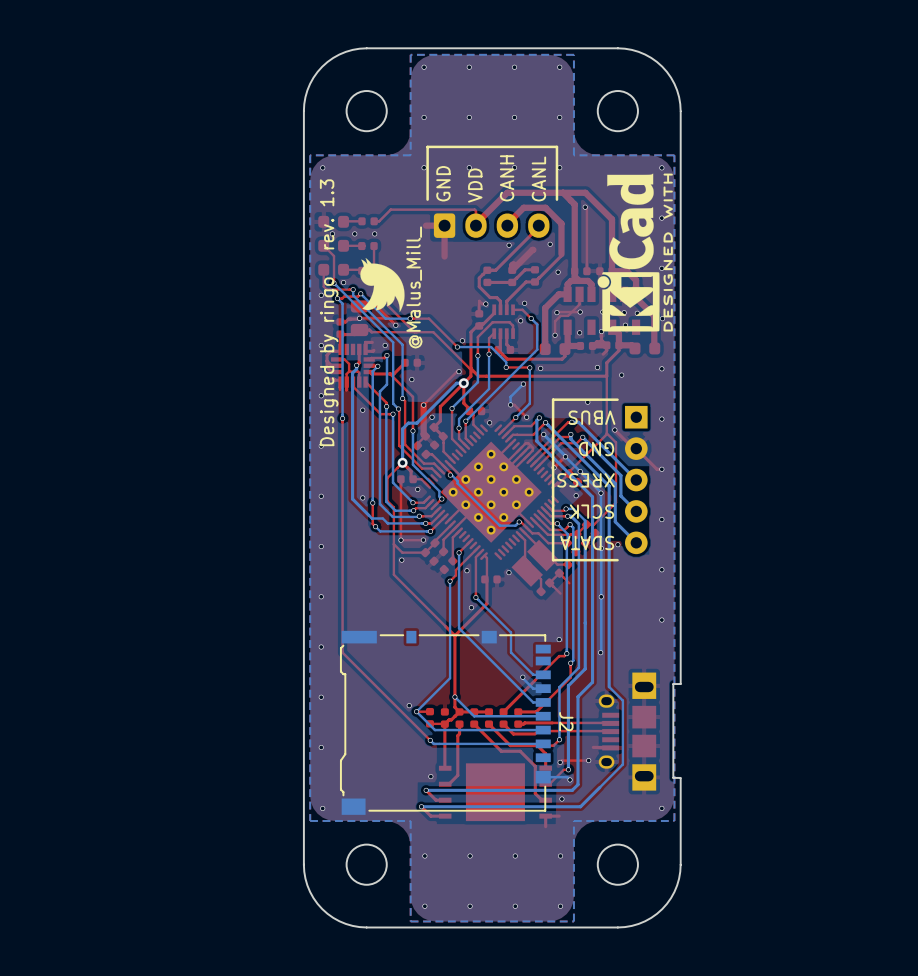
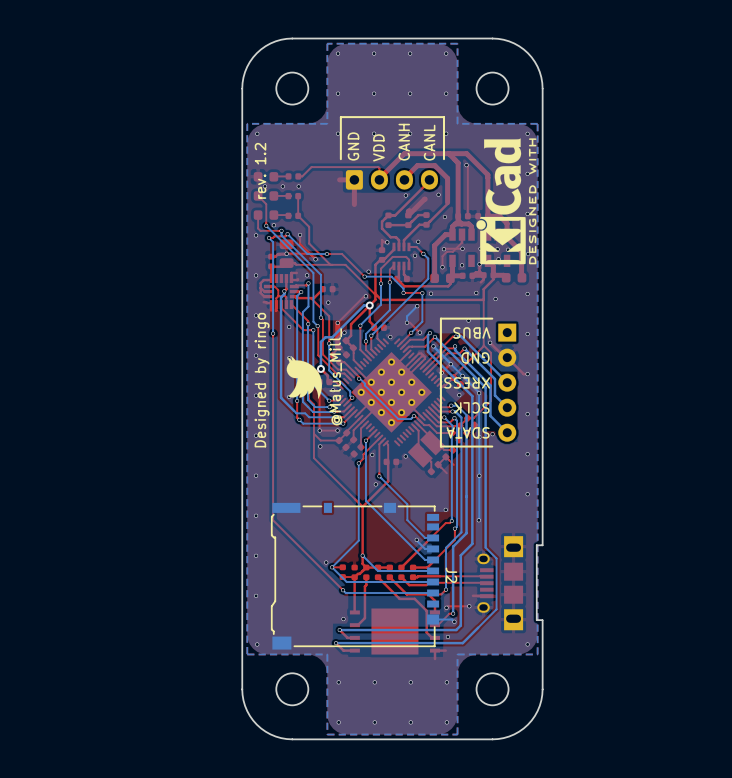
text: rev. 1.3 (327, 214) -> rev. 1.2 (260, 170)
drawing position: (382, 285) -> (304, 377)
text position: @Malus_Mill_ (414, 287) -> @Malus_Mill_ (335, 376)
text position: Designed by ringo (329, 361) -> Designed by ringo (262, 380)

